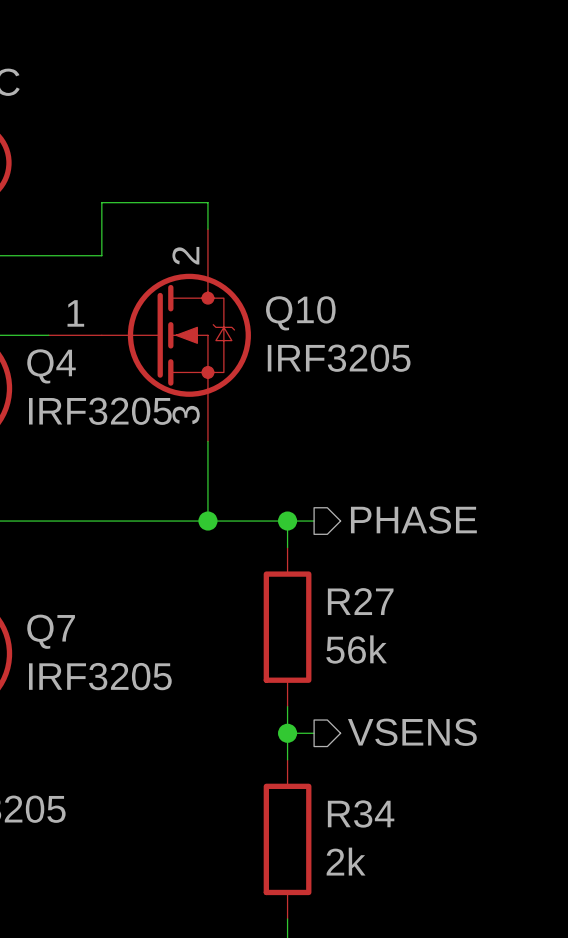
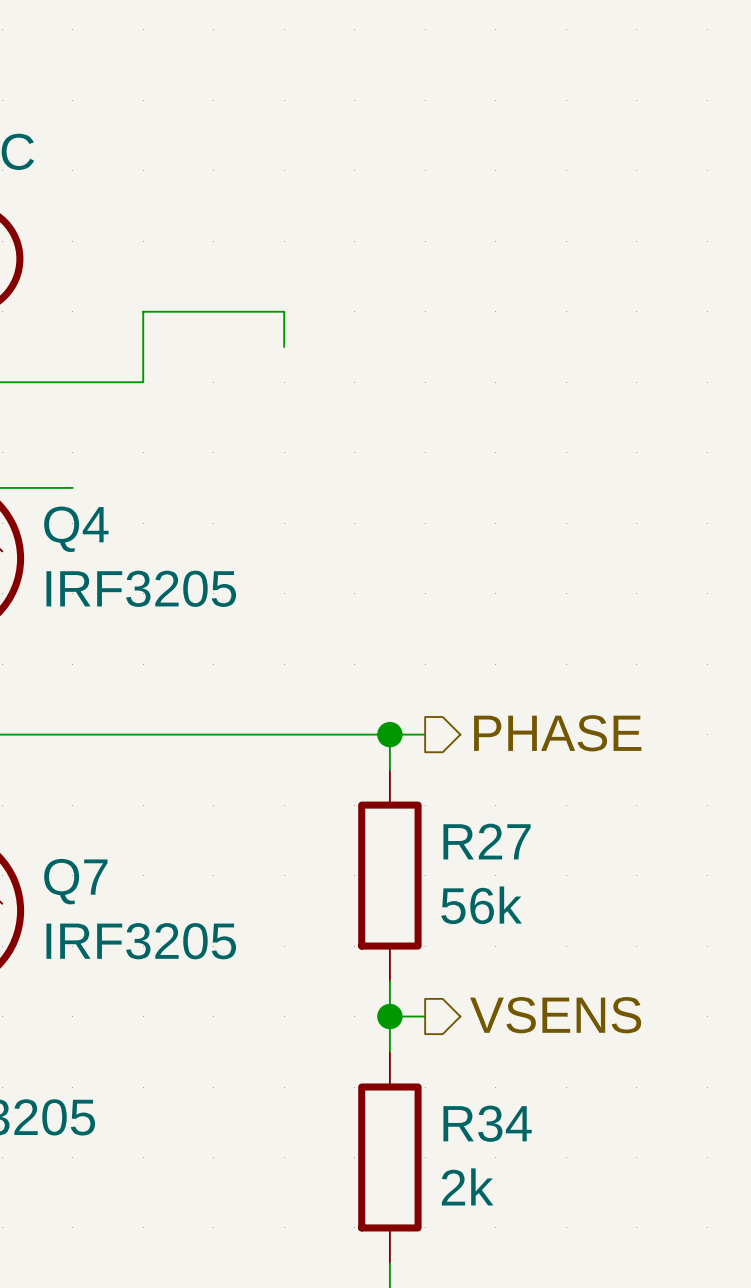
Q10: IRF3205 (149, 335) -> none
wire: (207, 441) (207, 521) -> none
junction: (207, 521) -> none

